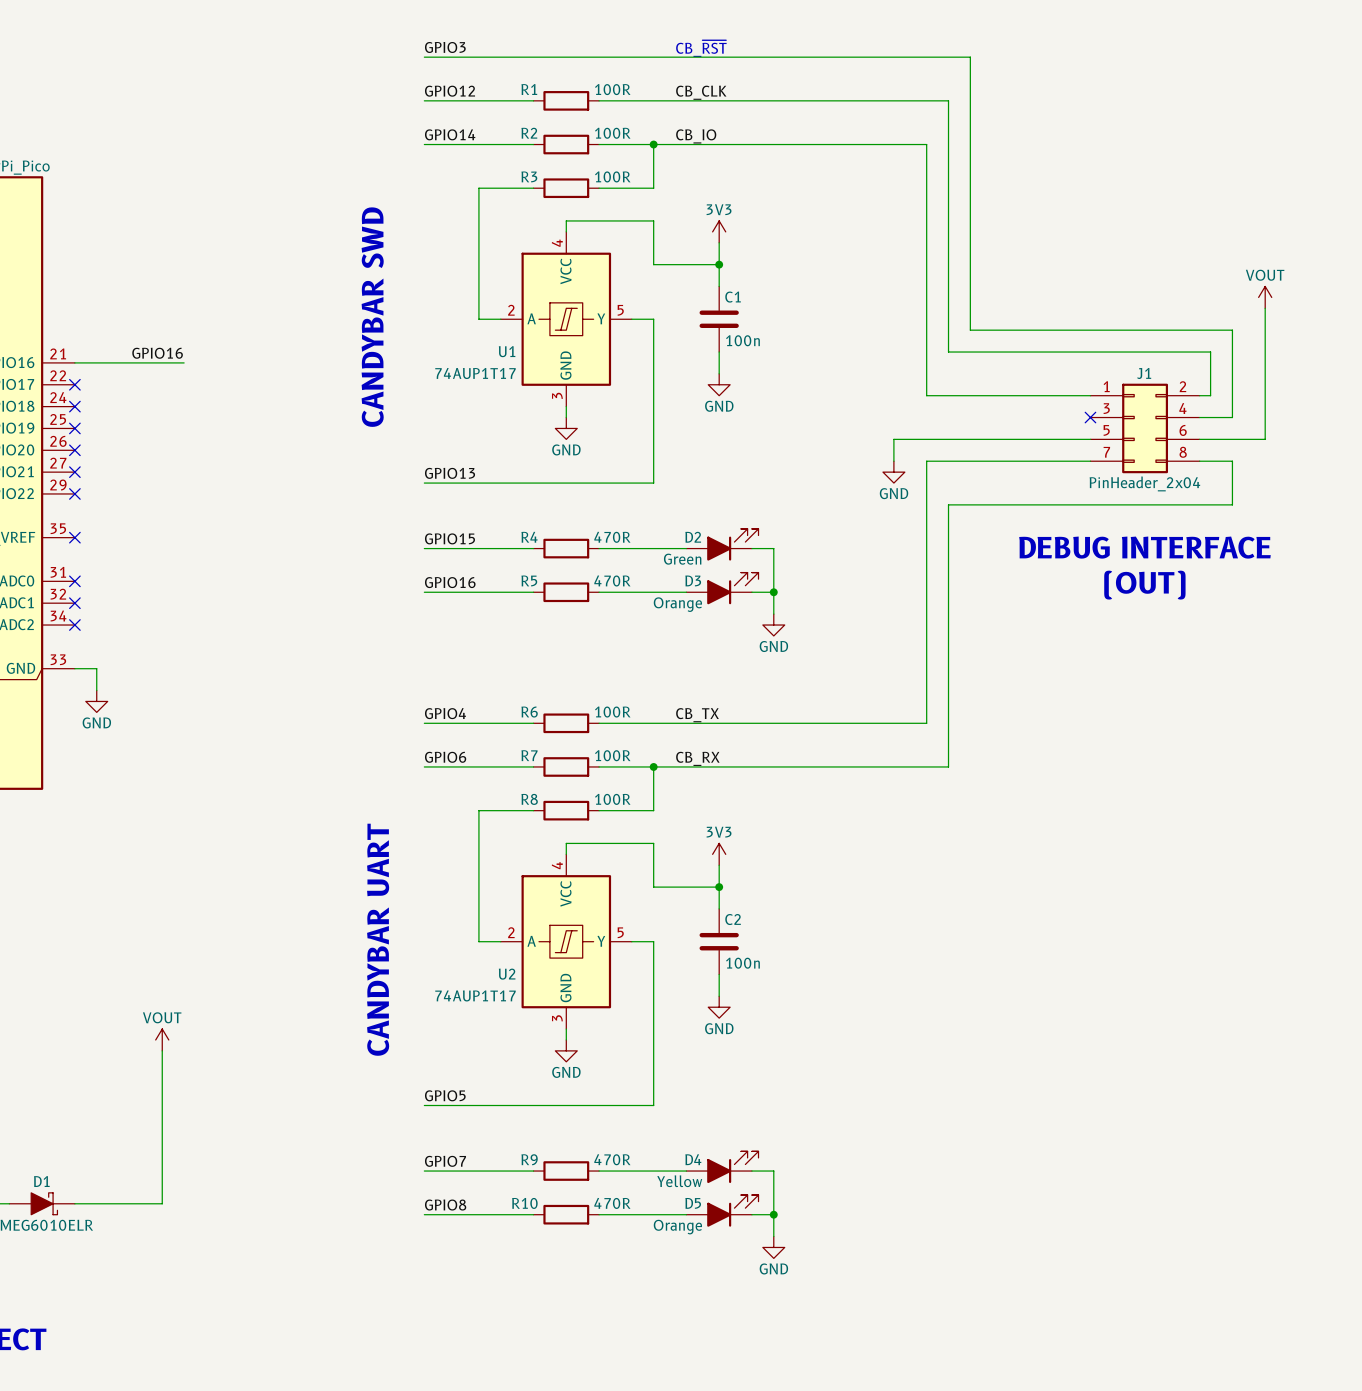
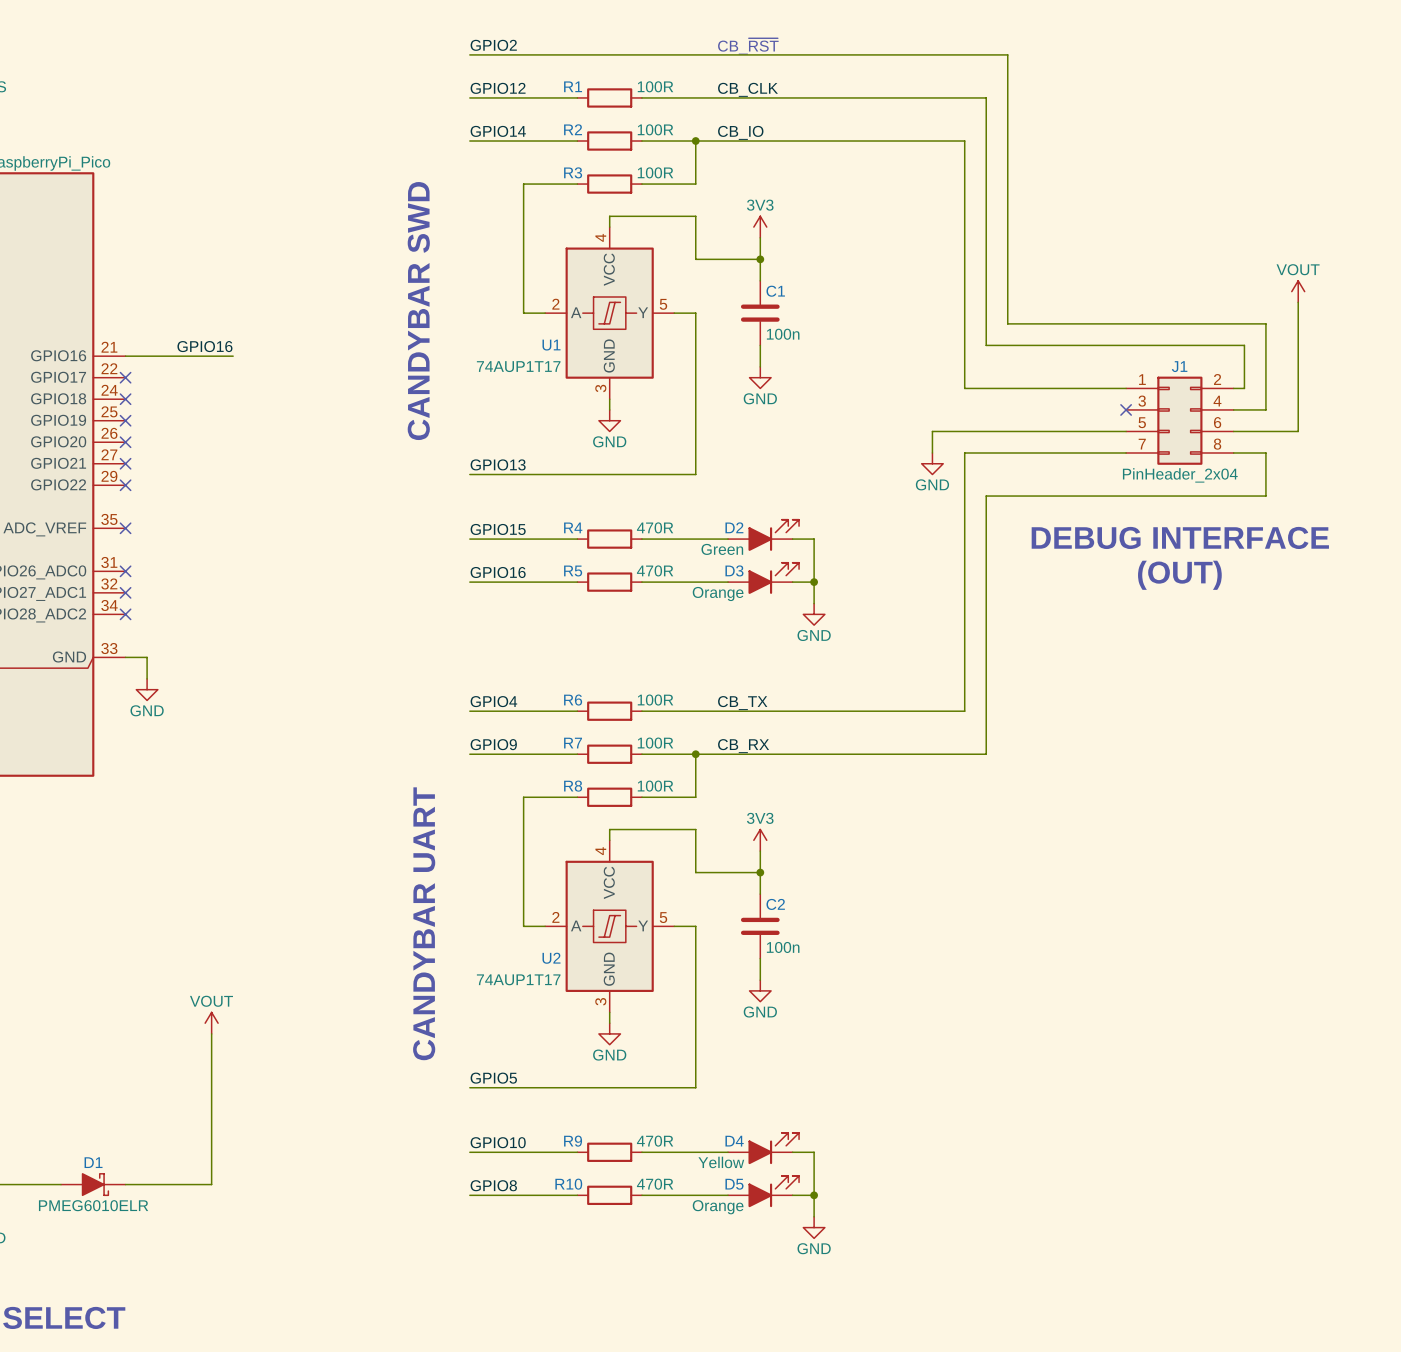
label: GPIO3 (445, 47) -> GPIO2 (493, 45)
label: GPIO6 (445, 757) -> GPIO9 (493, 744)
label: GPIO7 (445, 1161) -> GPIO10 (498, 1142)

